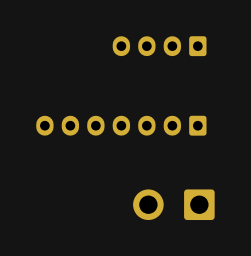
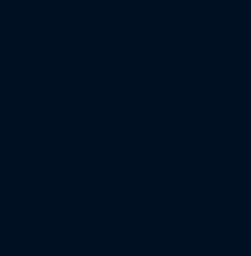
part: (159, 46) -> none
part: (121, 125) -> none
part: (173, 204) -> none

